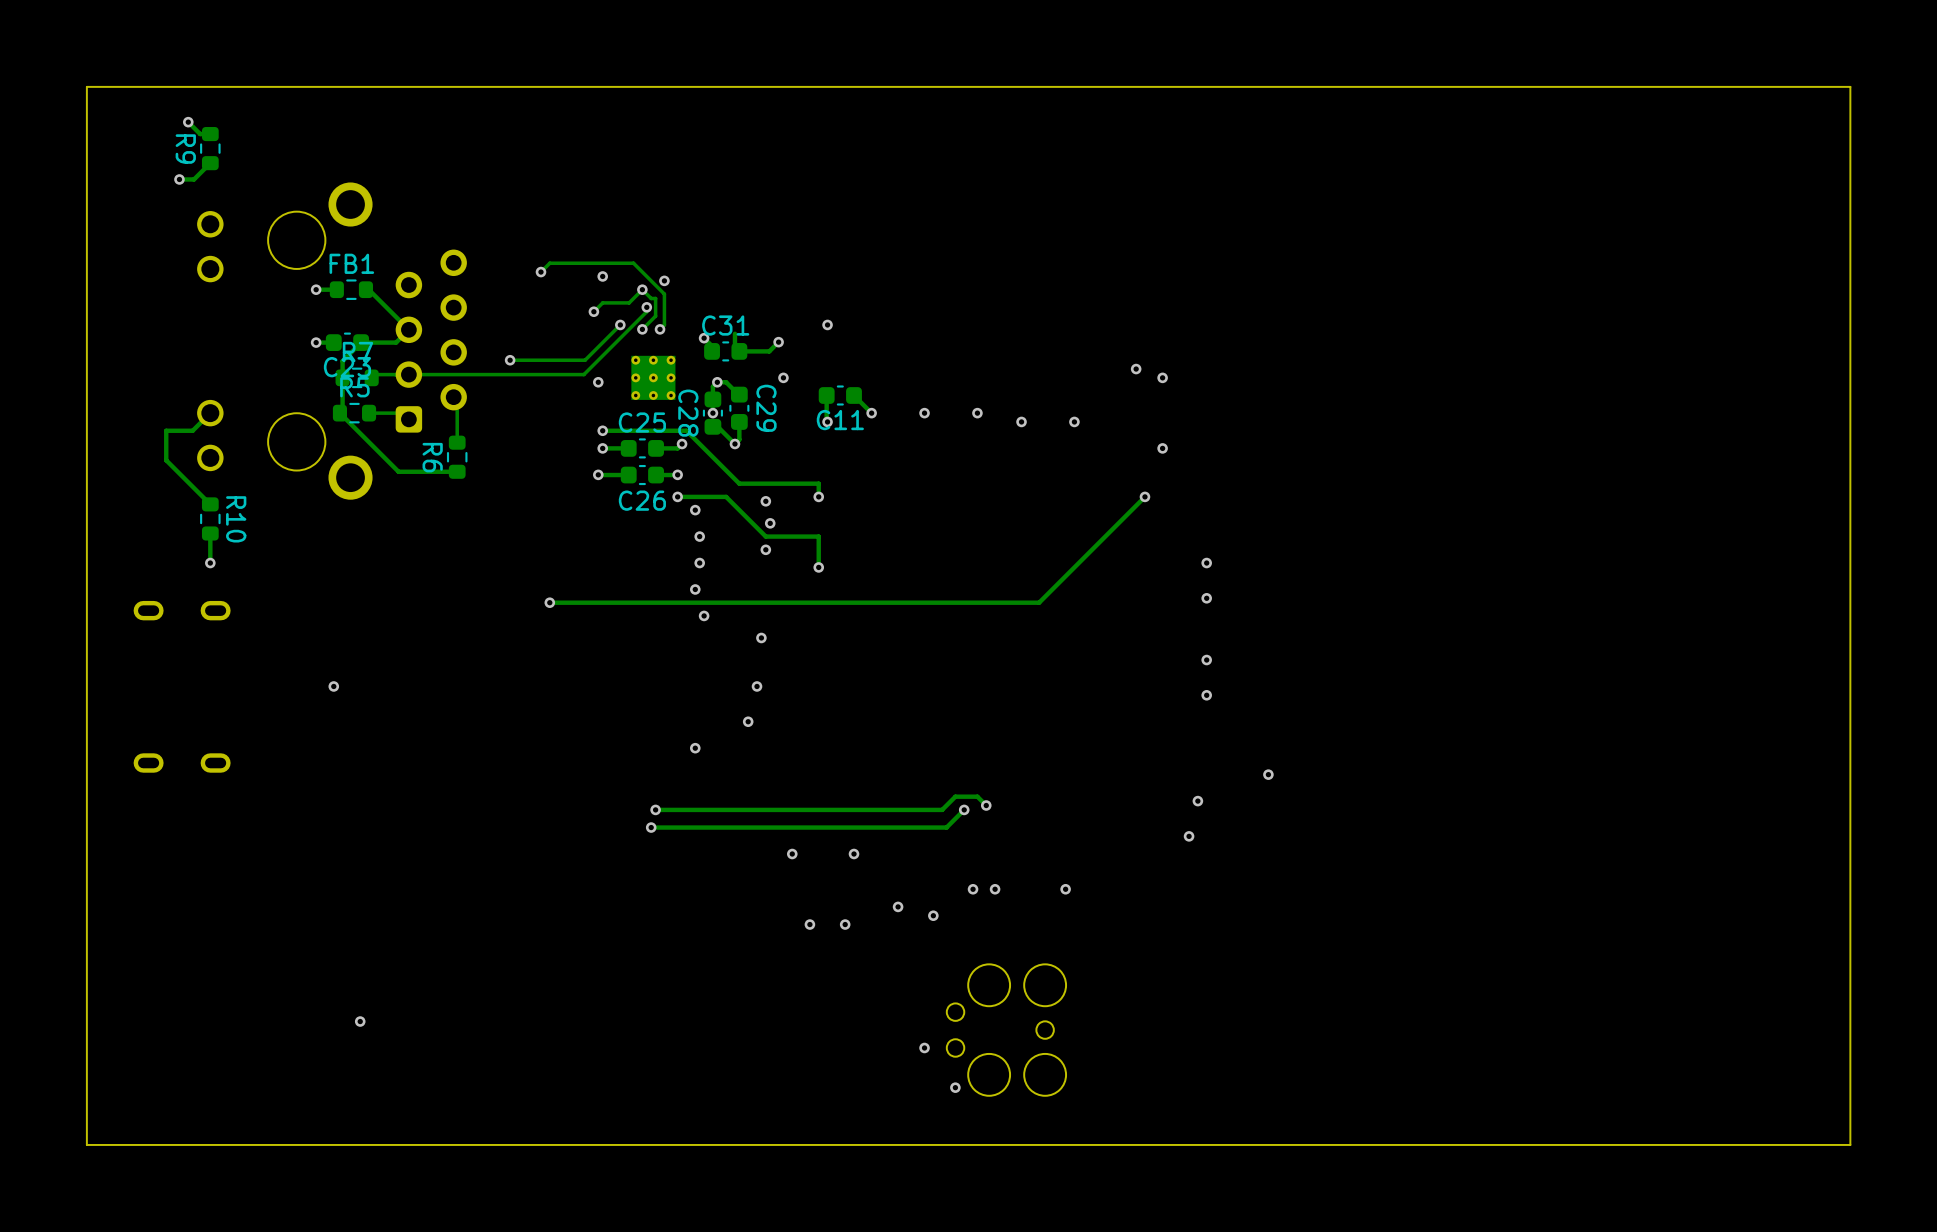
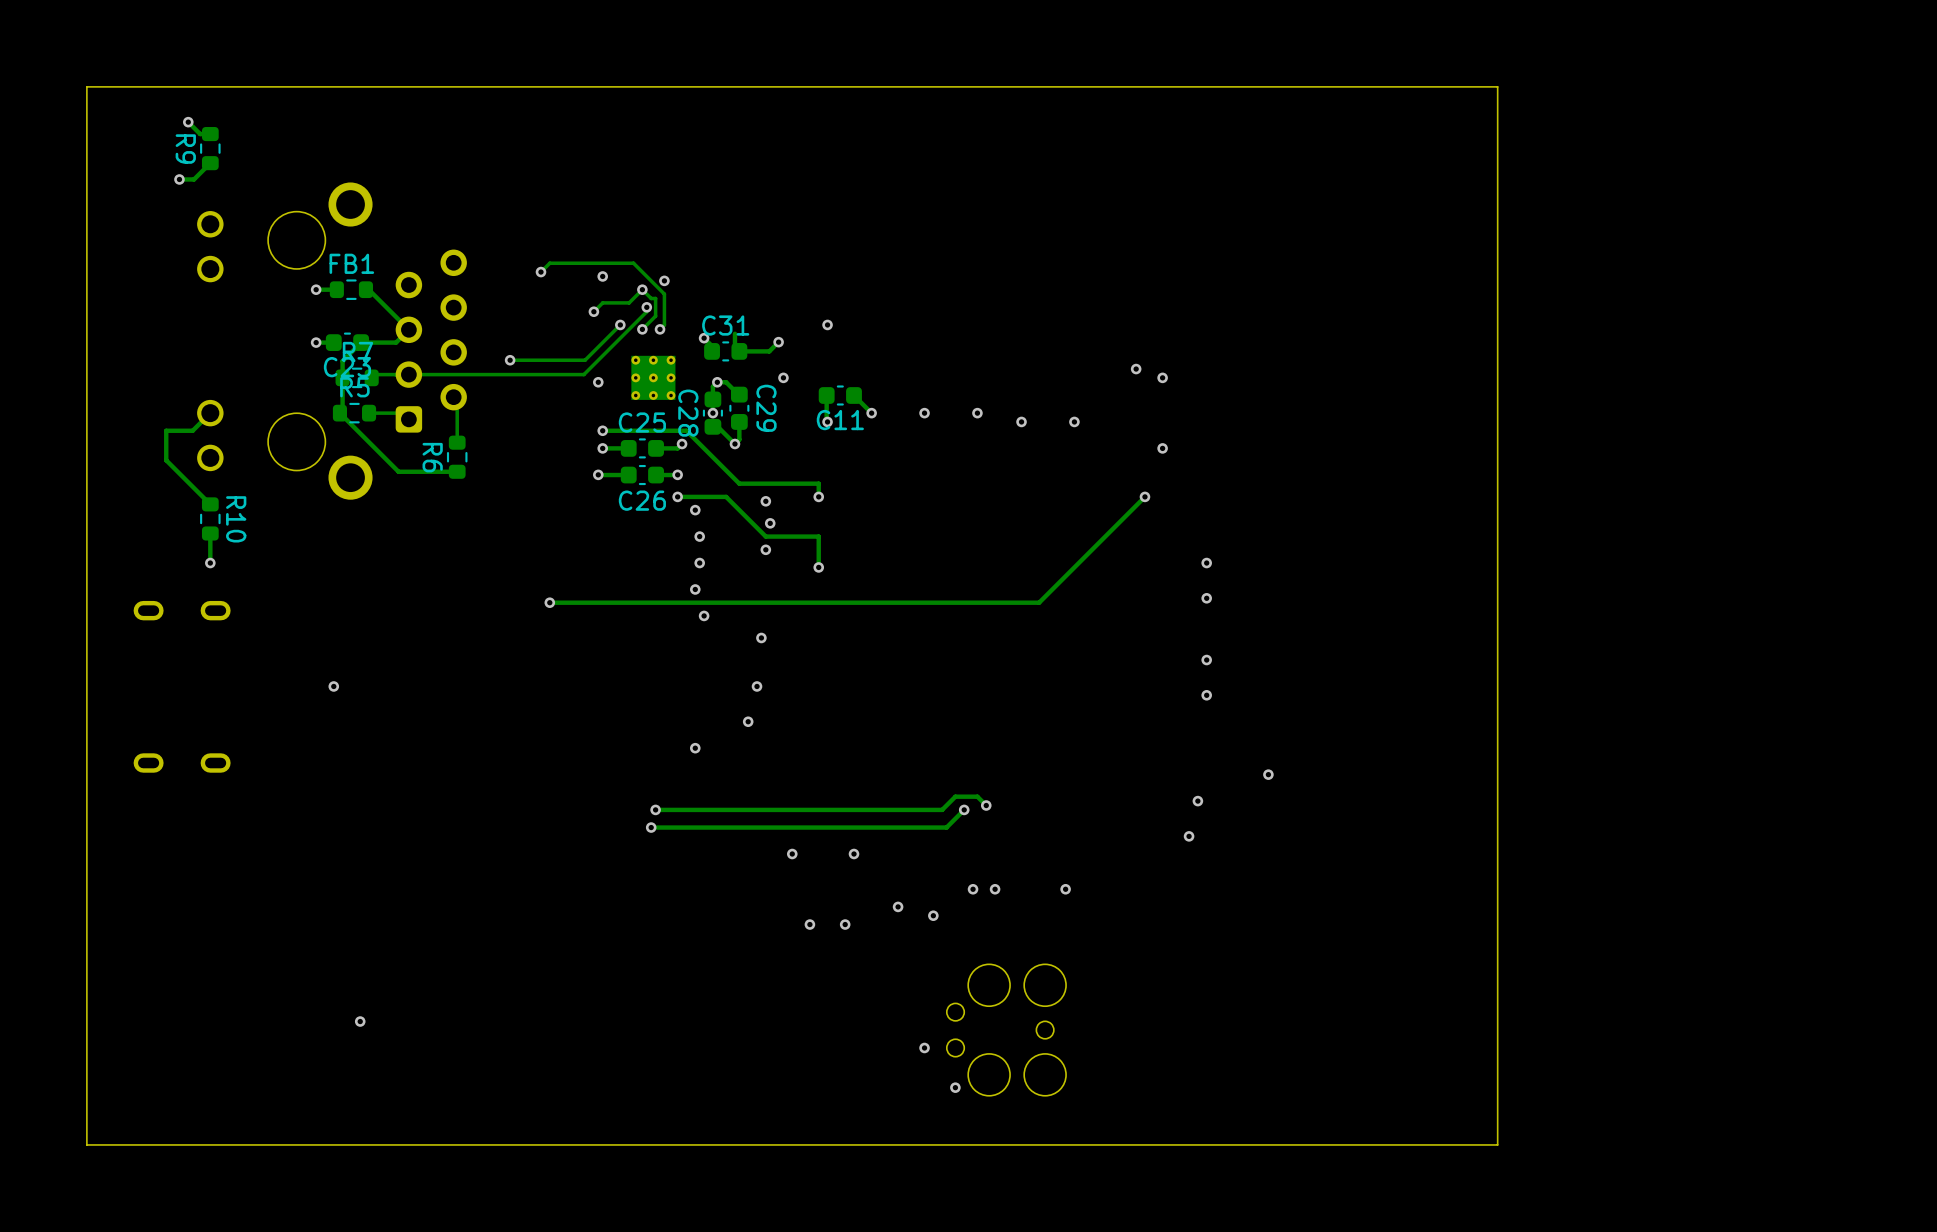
board edge: (1497, 86) (1850, 86) (1850, 1144) (1497, 1144) -> (1497, 86) (1497, 1144)

